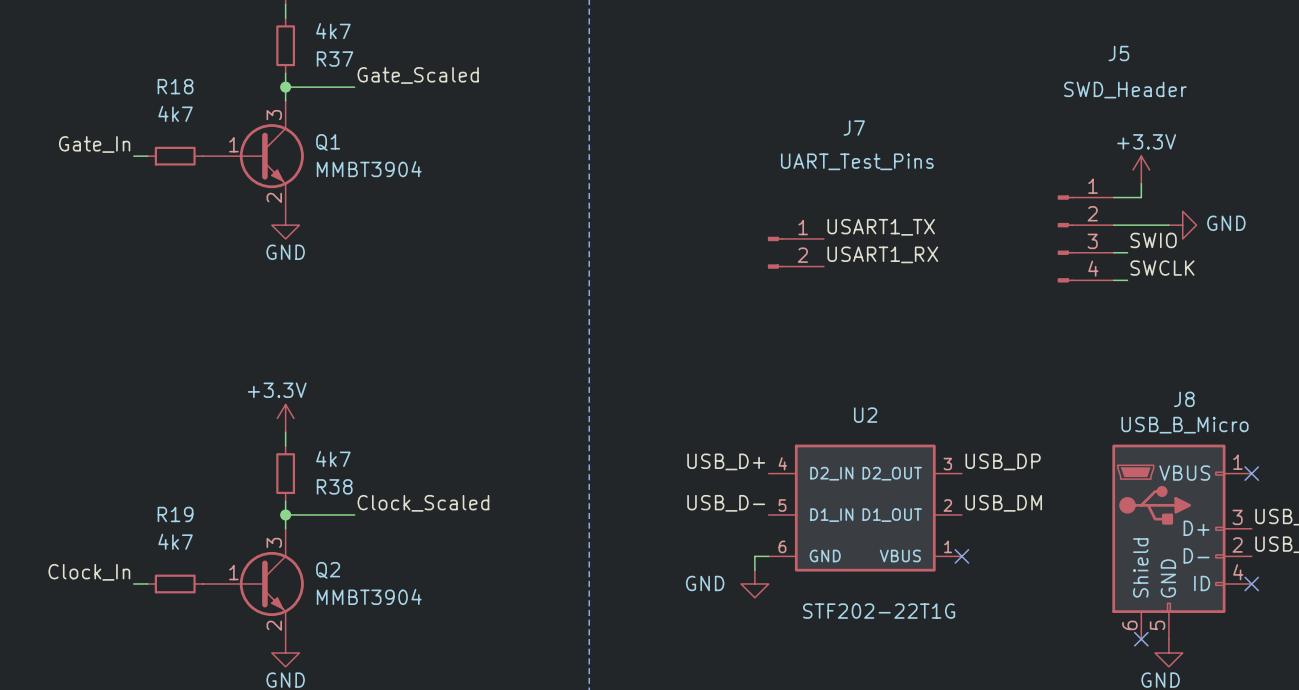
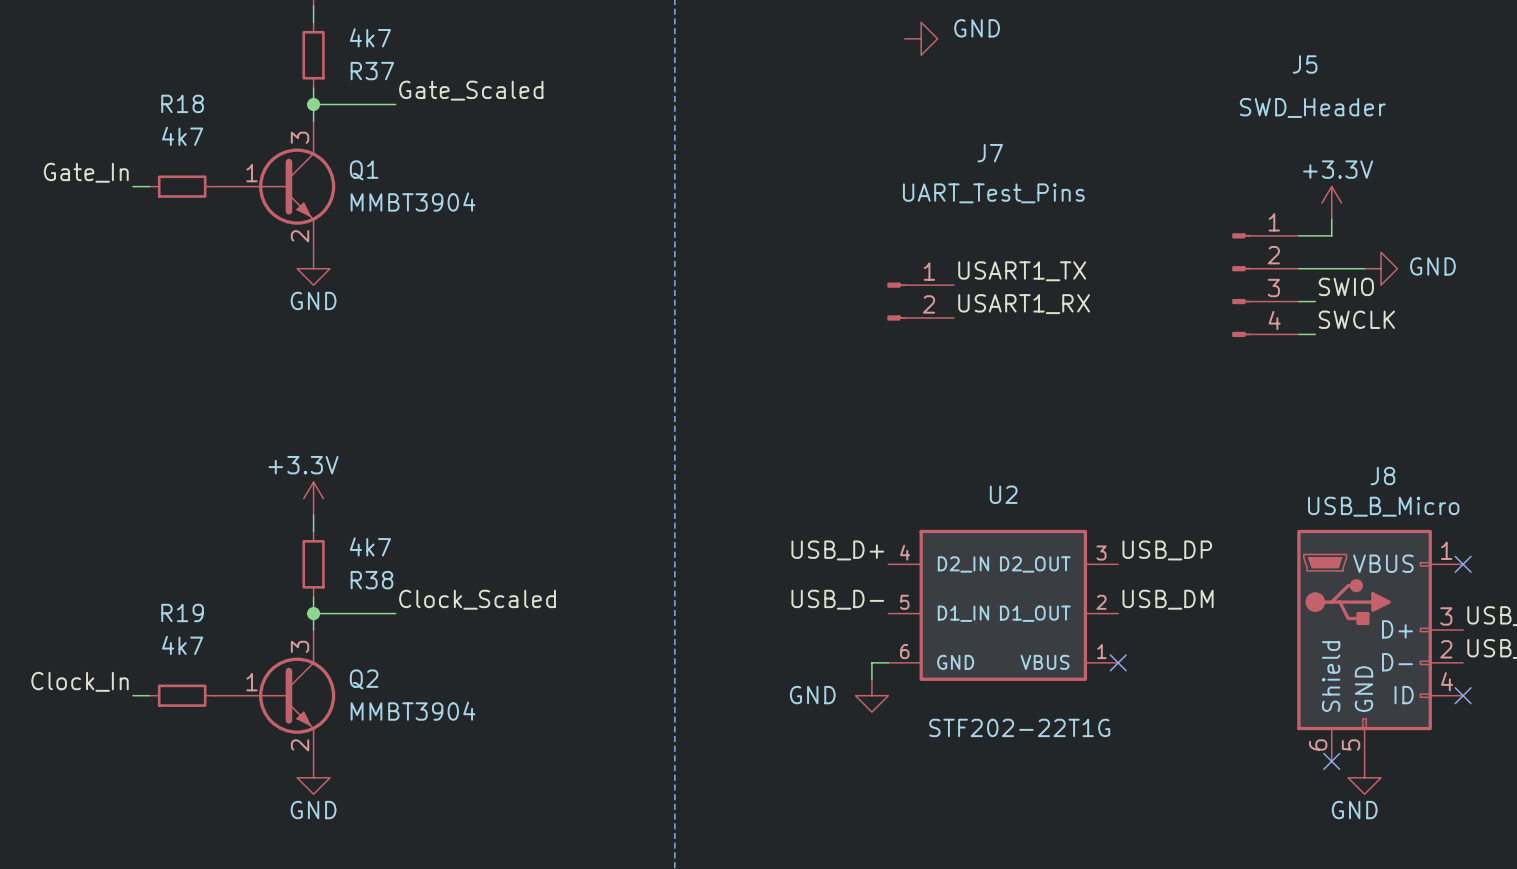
power symbol: none -> GND (921, 38)

